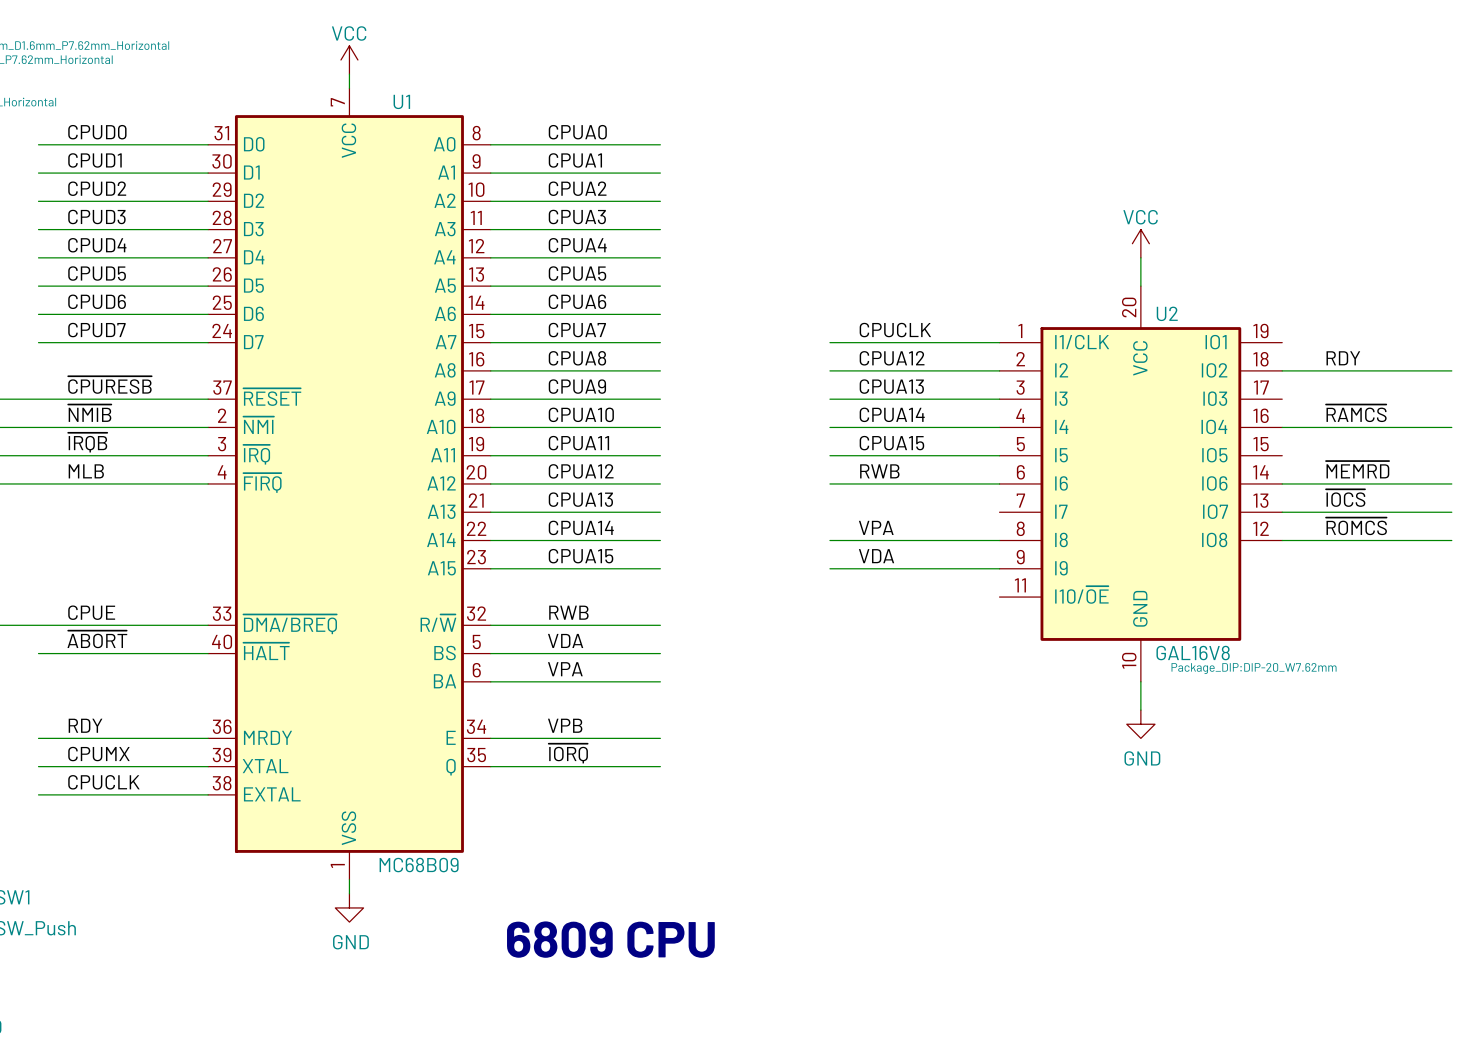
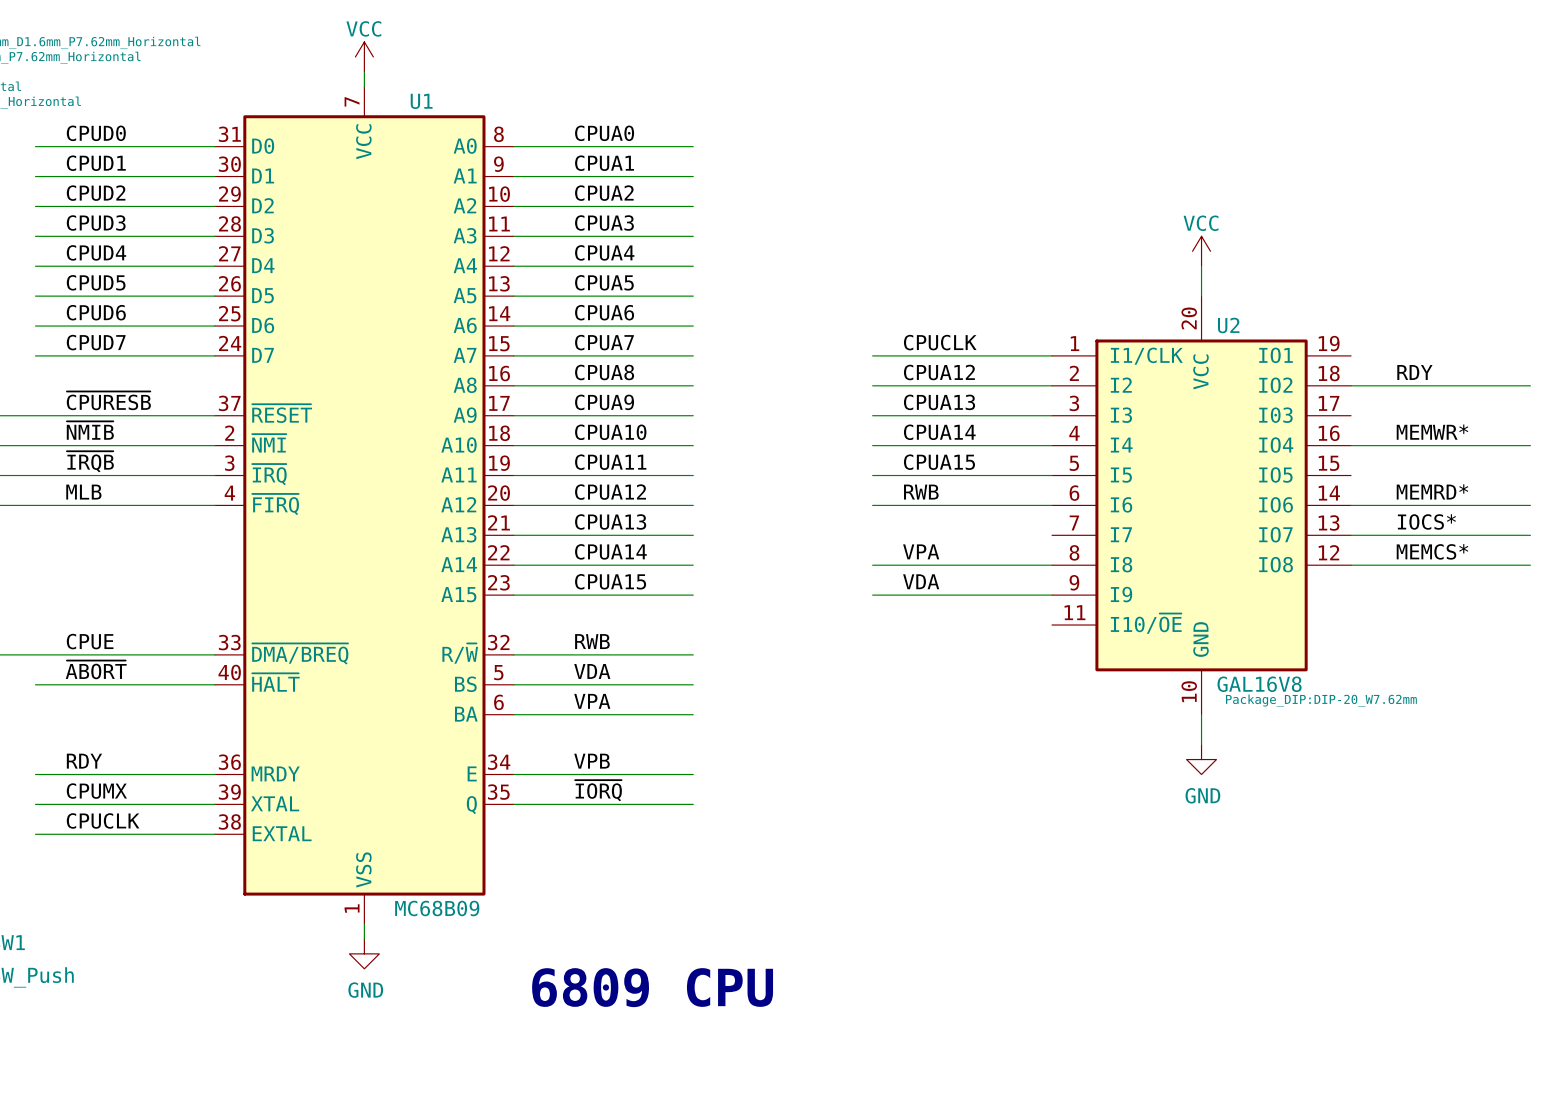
label: ~{RAMCS} (1356, 413) -> MEMWR* (1432, 432)
label: ~{MEMRD} (1357, 469) -> MEMRD* (1432, 491)
label: ~{IOCS} (1345, 498) -> IOCS* (1426, 521)
label: ~{ROMCS} (1356, 526) -> MEMCS* (1432, 551)

